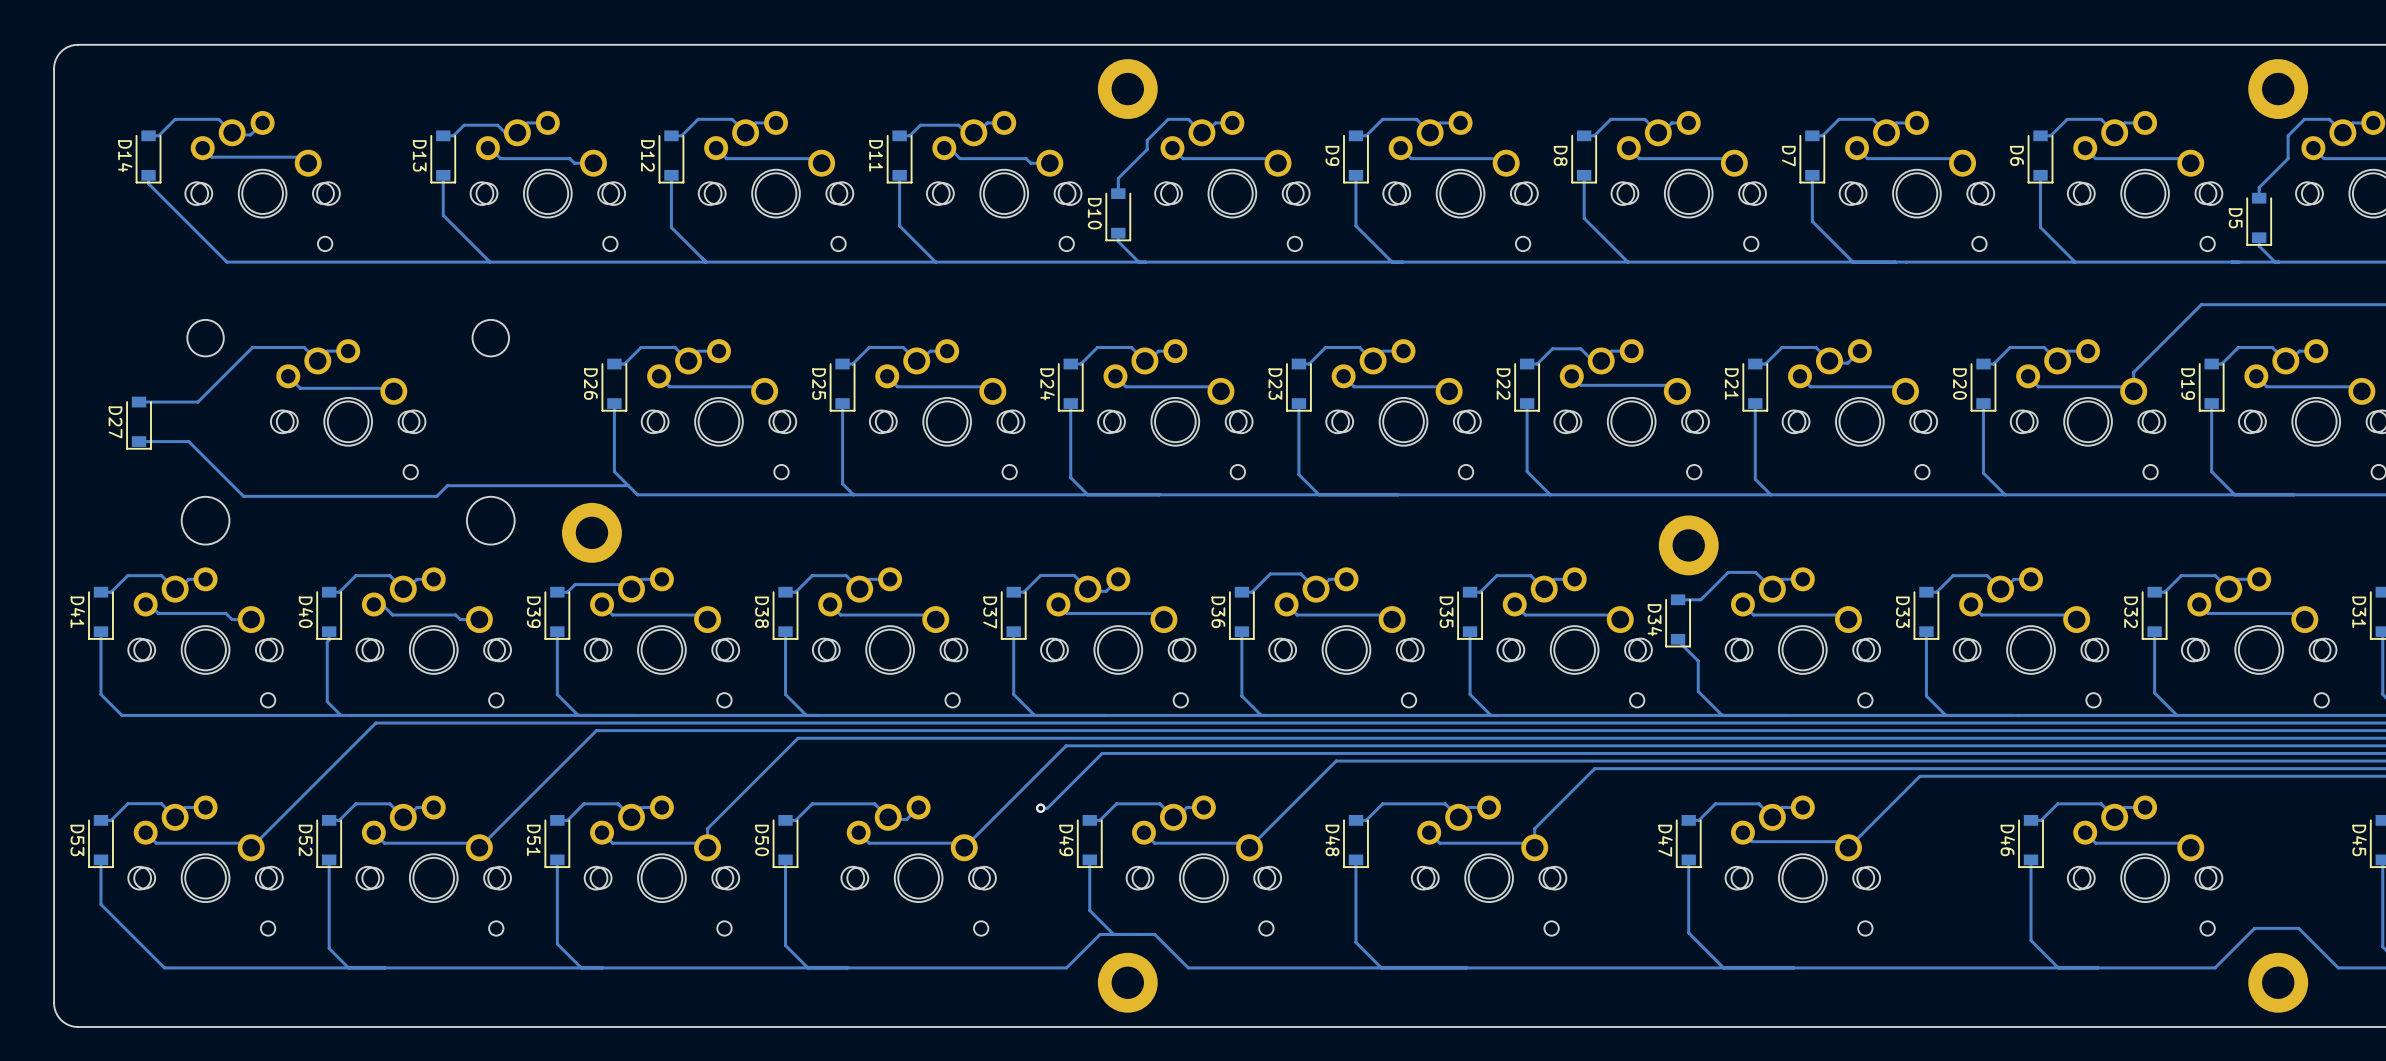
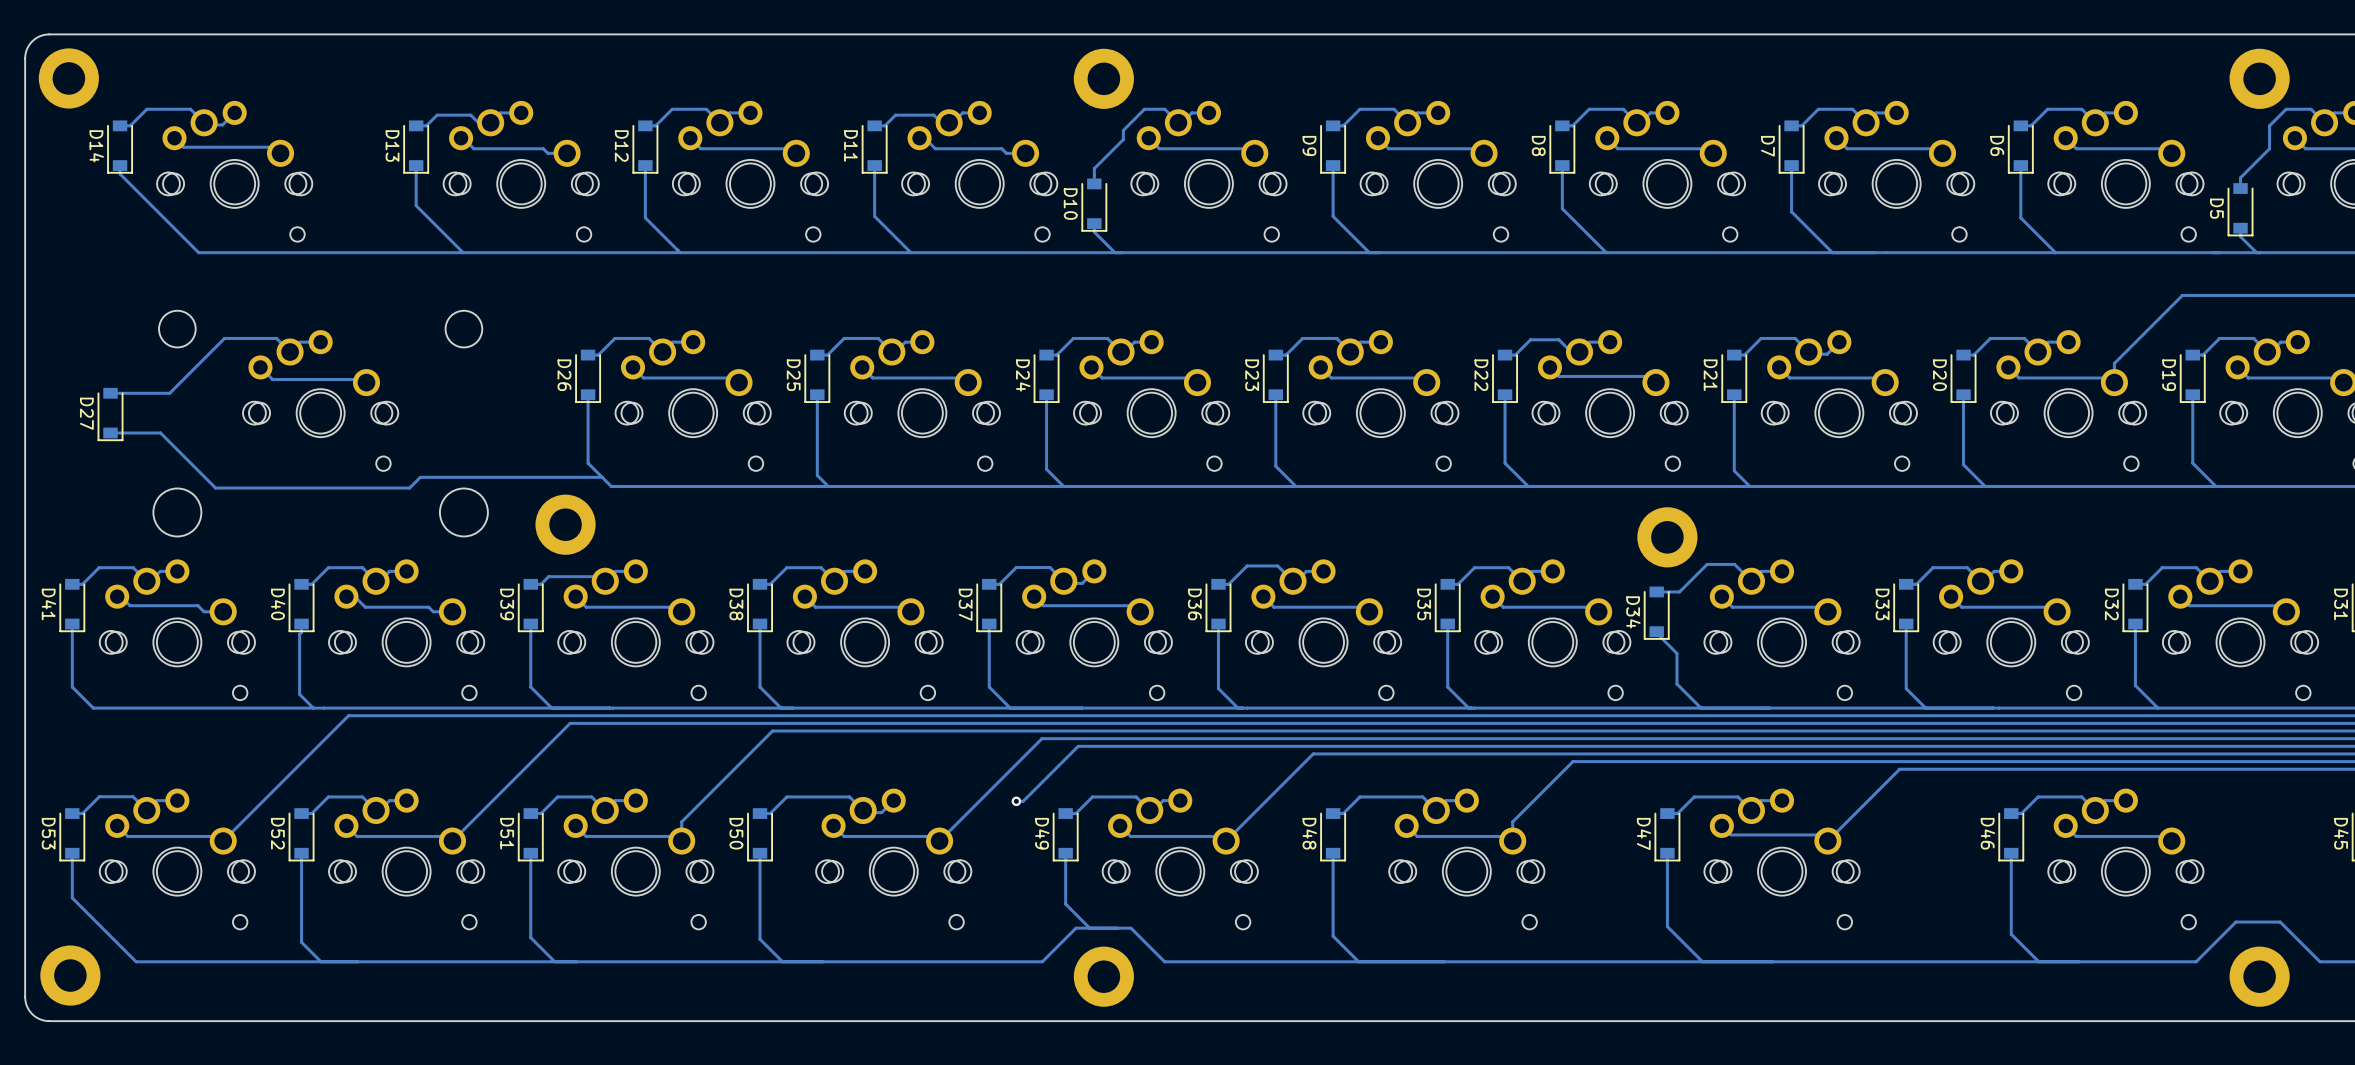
part: none -> (68, 78)
part: none -> (70, 975)

